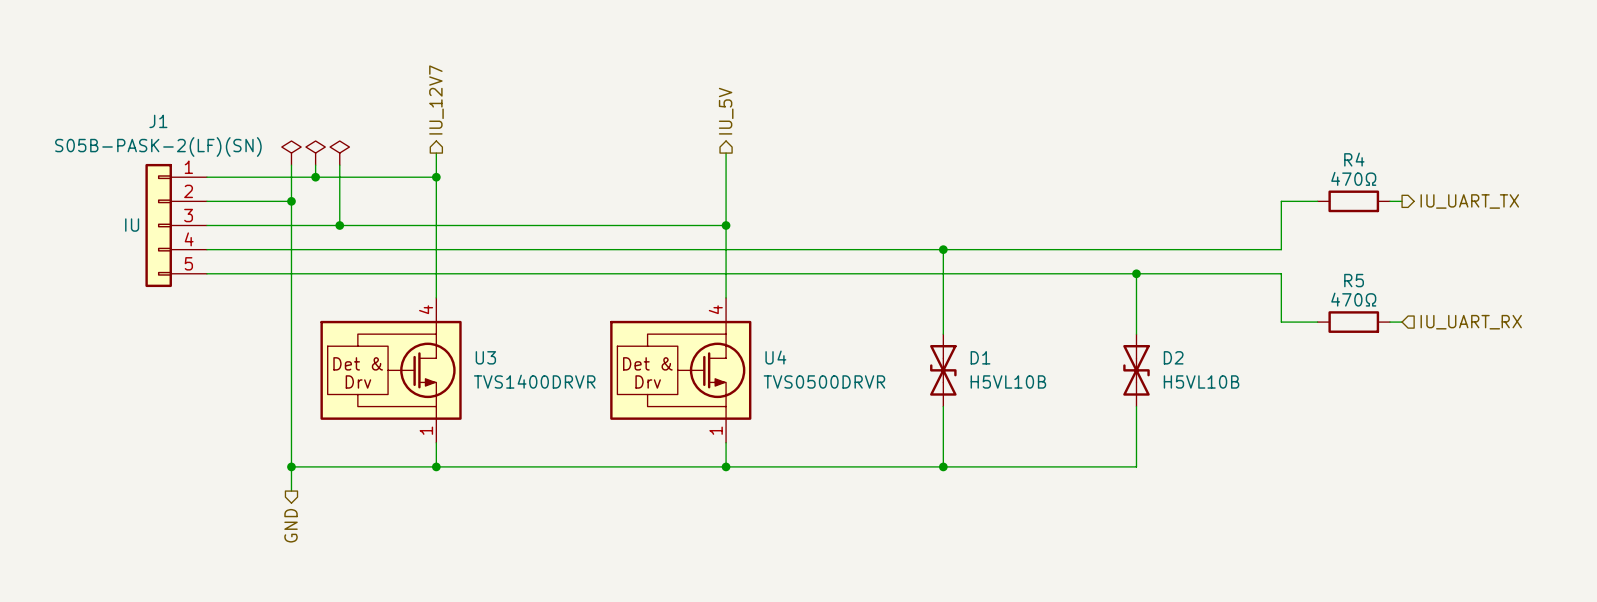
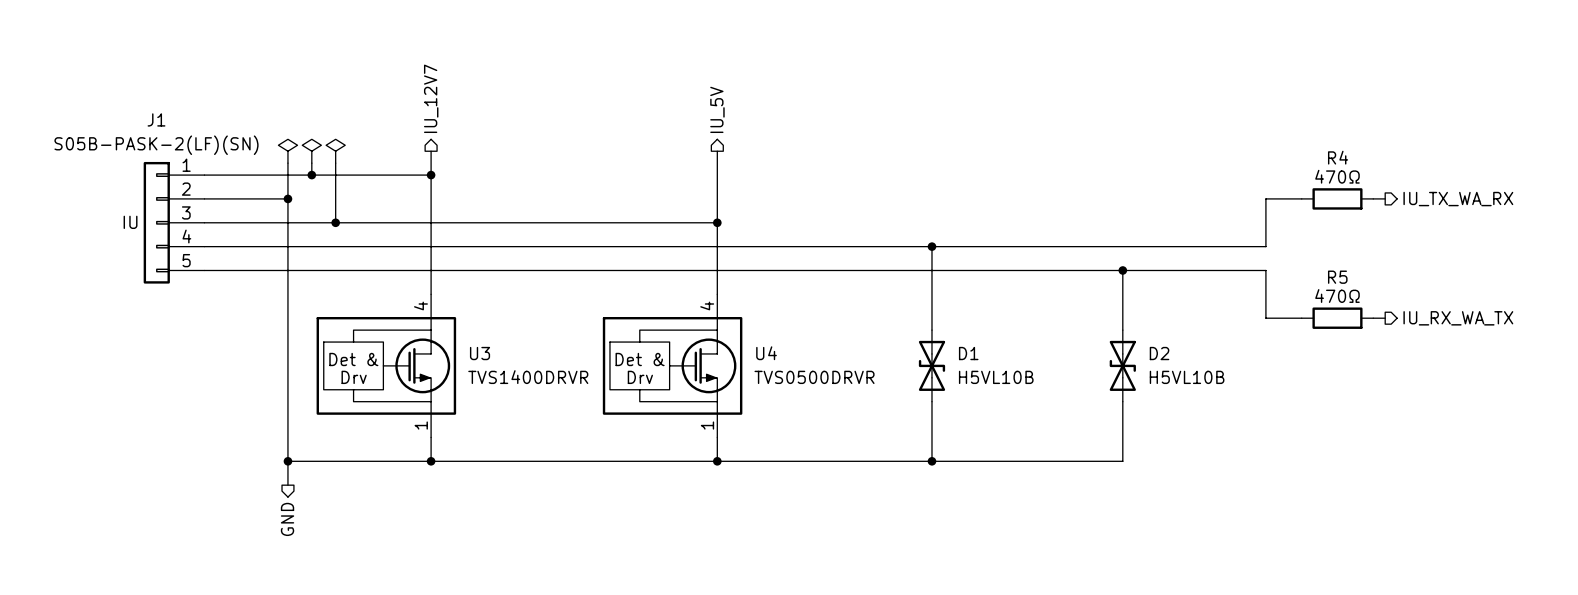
hierarchical label: IU_UART_TX (1469, 201) -> IU_TX_WA_RX (1458, 199)
hierarchical label shape: input (1471, 322) -> output (1458, 318)
hierarchical label: IU_UART_RX (1471, 322) -> IU_RX_WA_TX (1458, 318)

